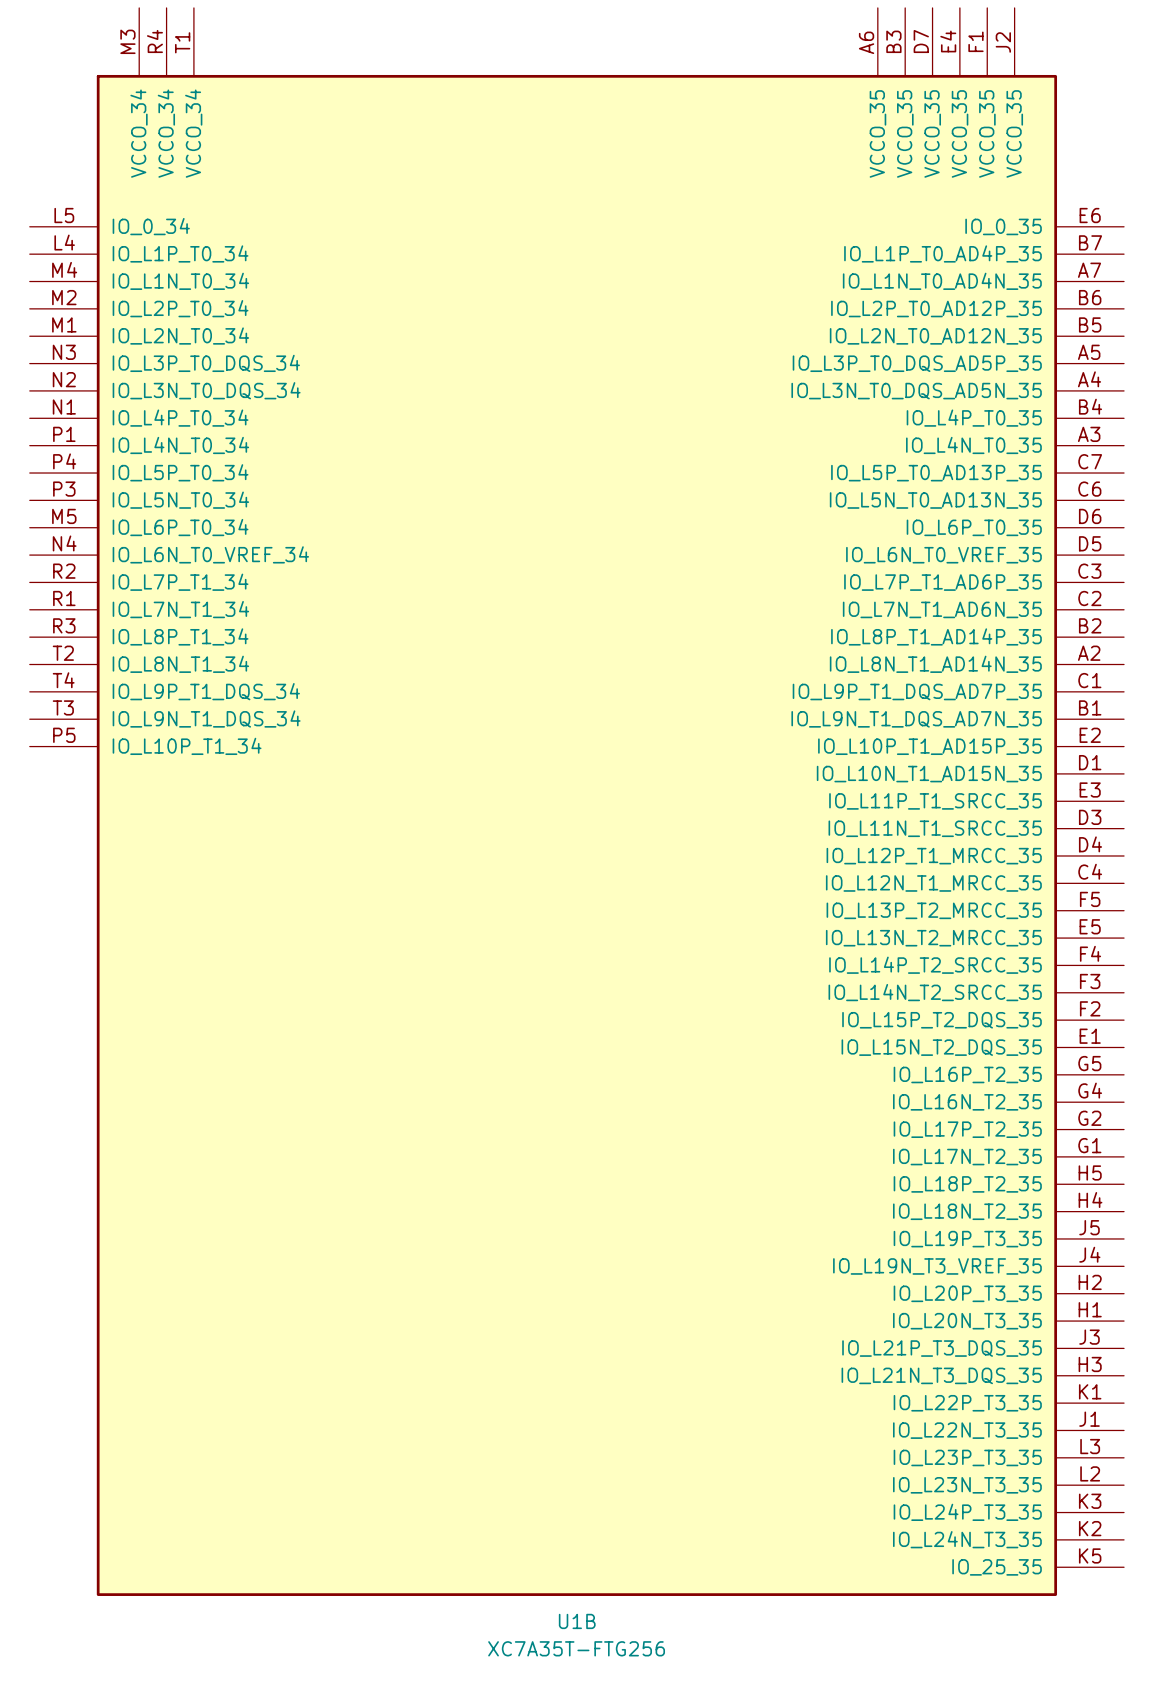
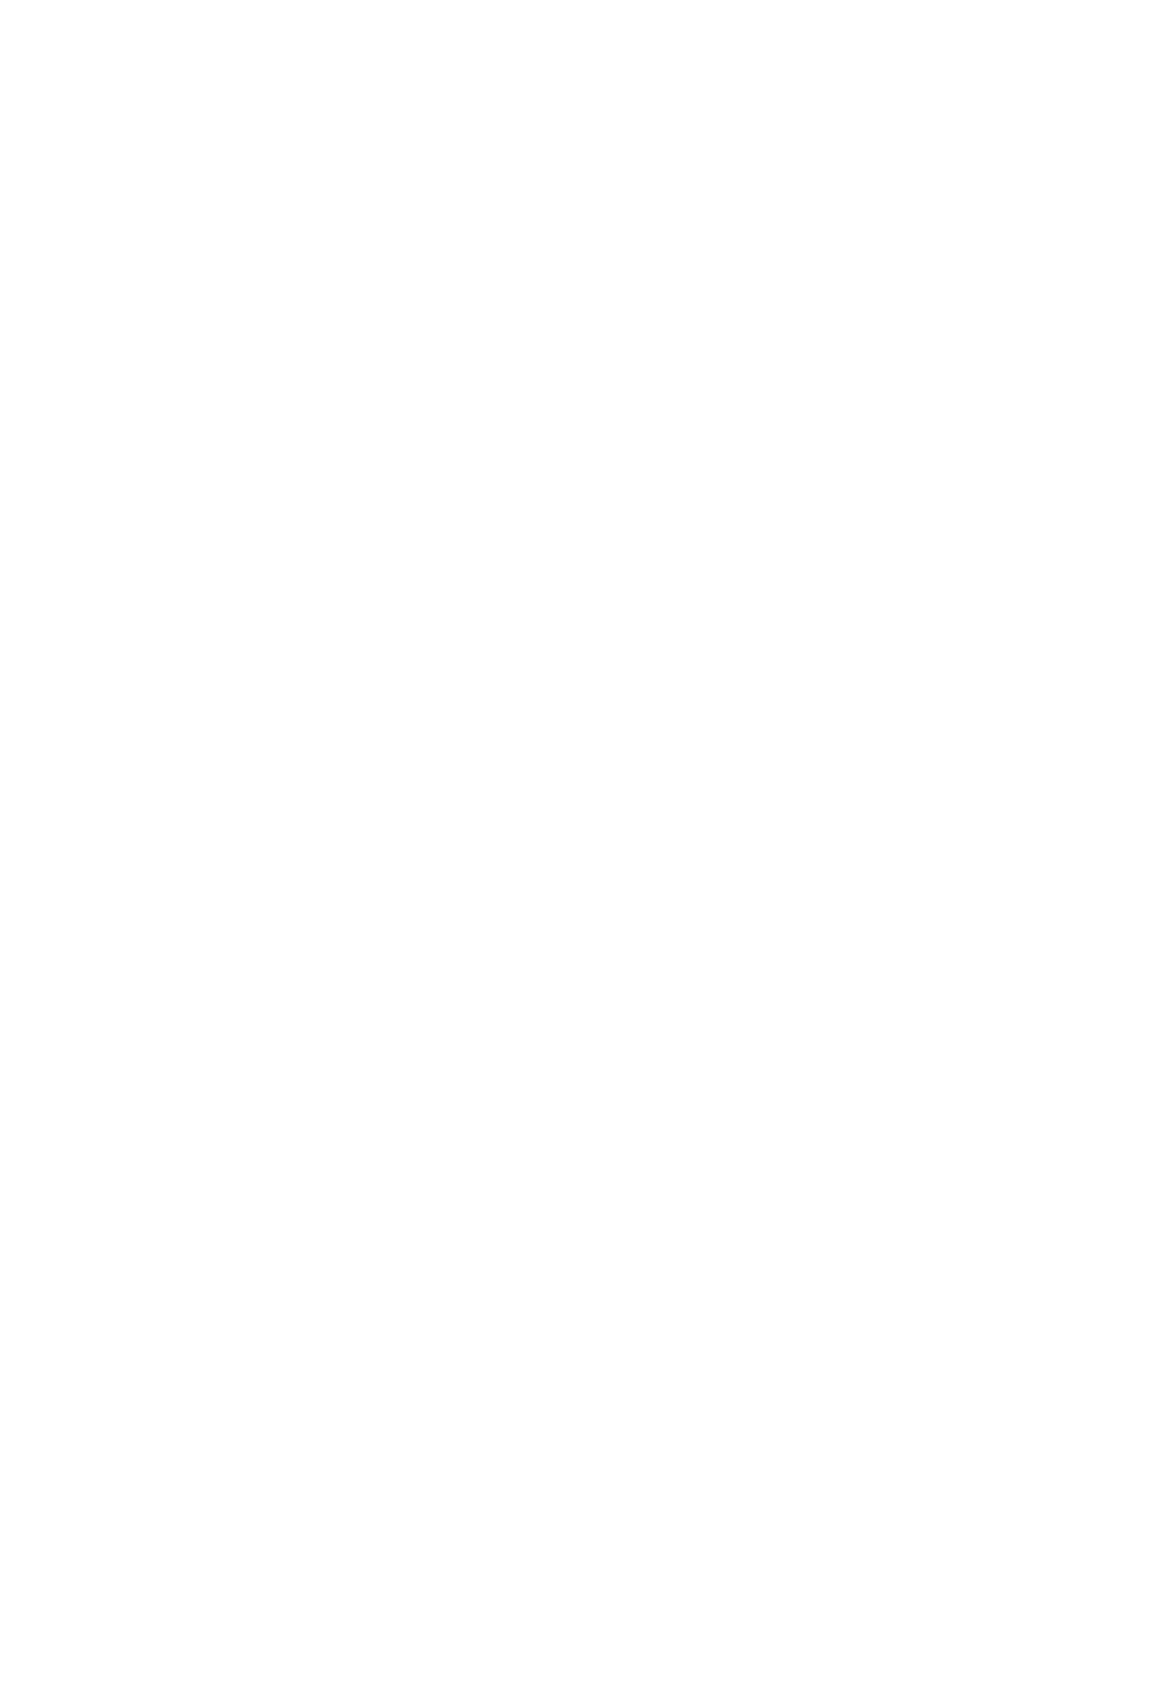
U1B: XC7A35T-FTG256 (576, 801) -> none

